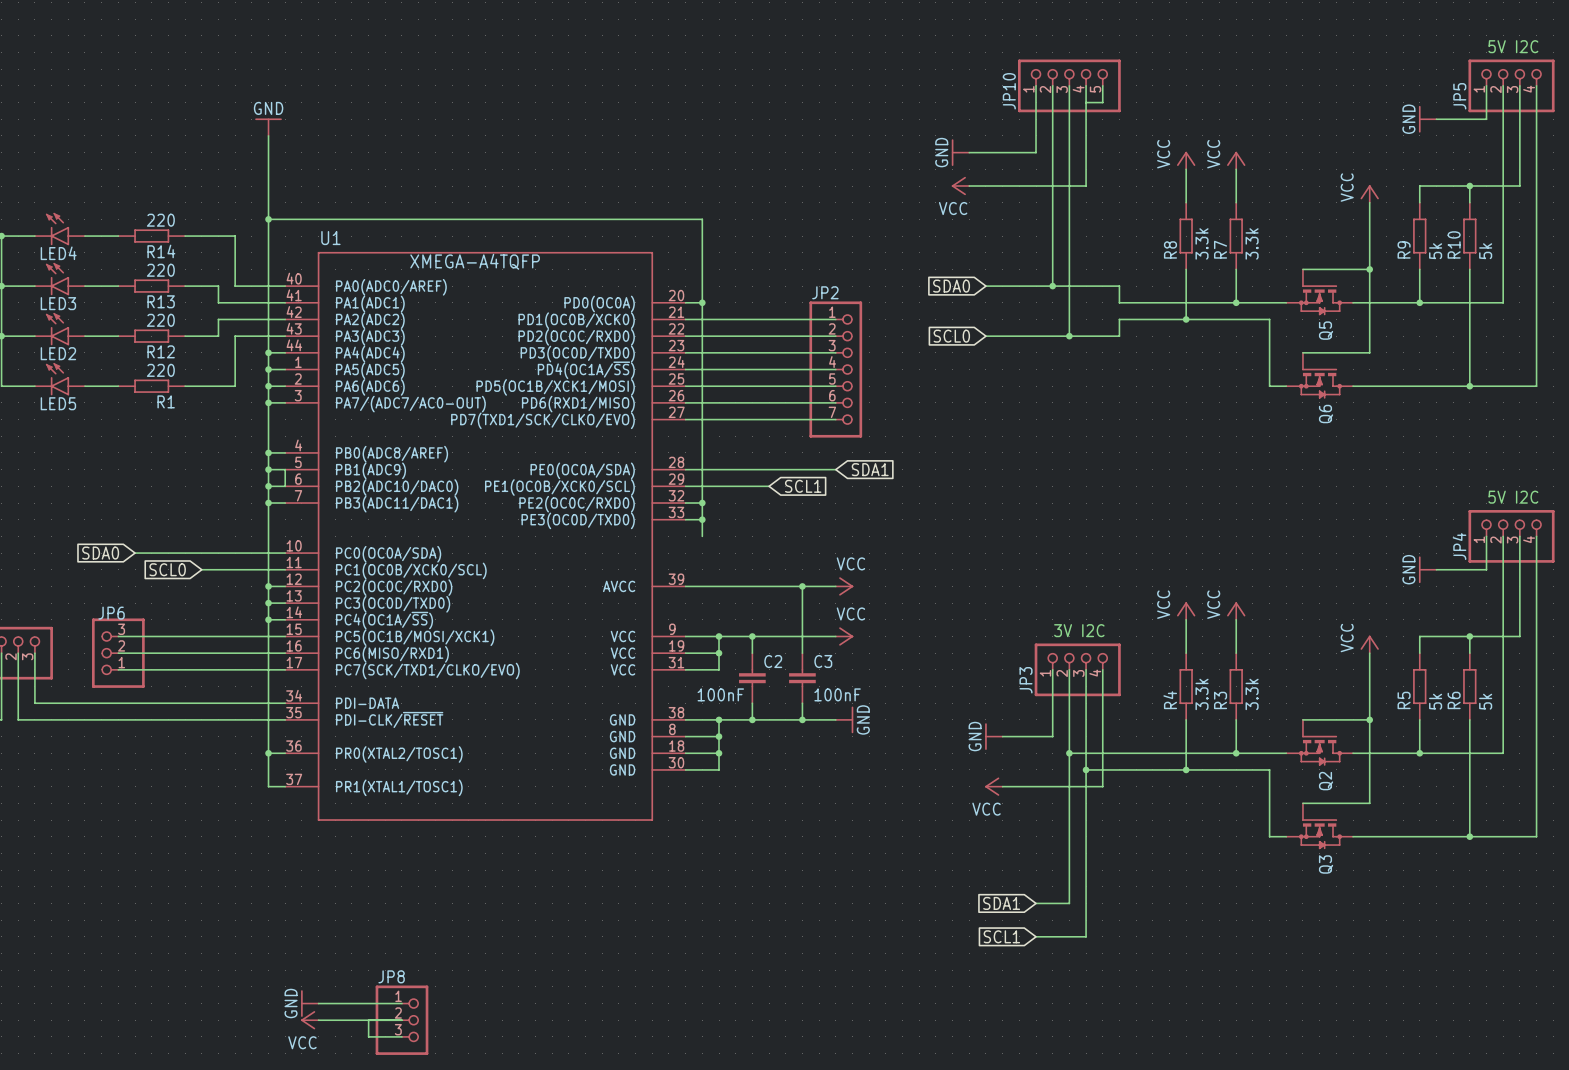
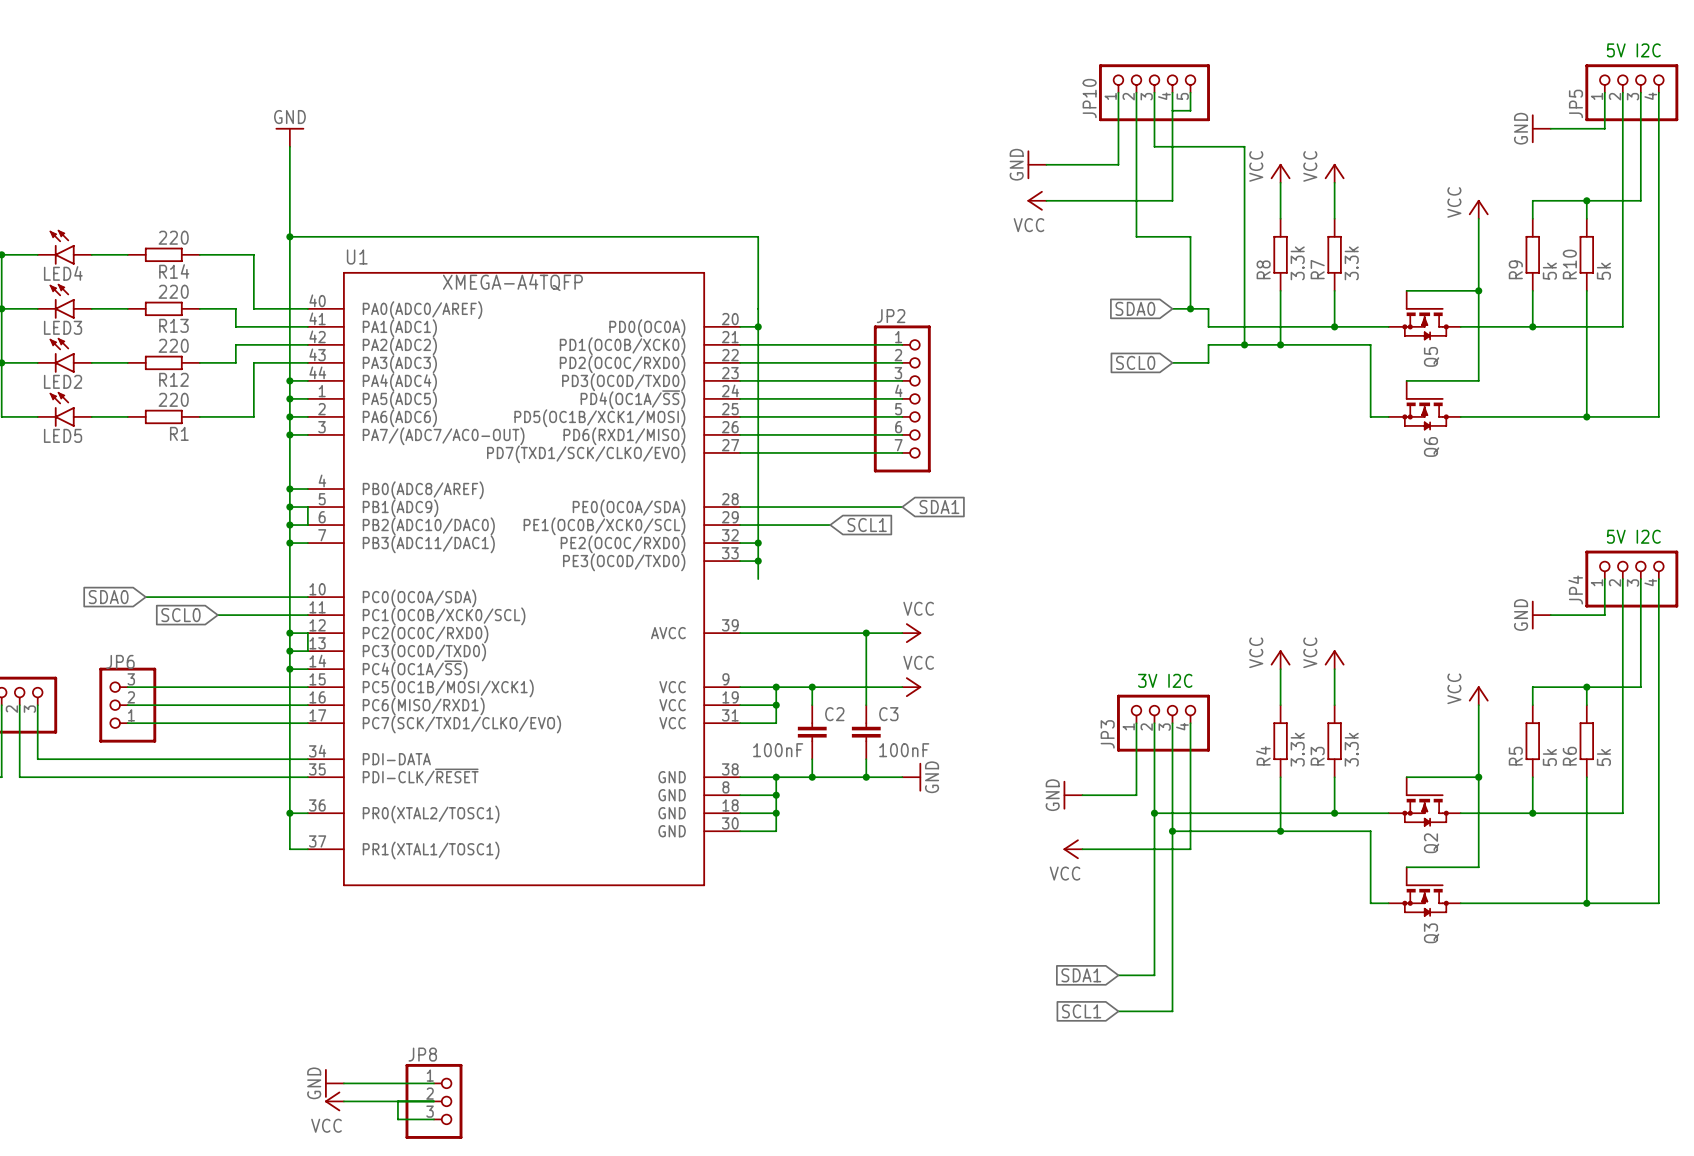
wire: (1069, 135) (1069, 336) -> (1154, 146) (1244, 146) (1244, 344)
wire: (1052, 219) (1052, 286) -> (1136, 236) (1190, 236) (1190, 308)
global label position: SDA0 (951, 286) -> SDA0 (1135, 308)
wire: (985, 286) (1086, 286) -> none
junction: (1052, 286) -> none
junction: none -> (1190, 308)
junction: none -> (1244, 344)
global label position: SCL0 (951, 336) -> SCL0 (1135, 362)
wire: (985, 336) (1086, 336) -> none
junction: (1069, 336) -> none
wire: none -> (307, 633) (307, 651)

